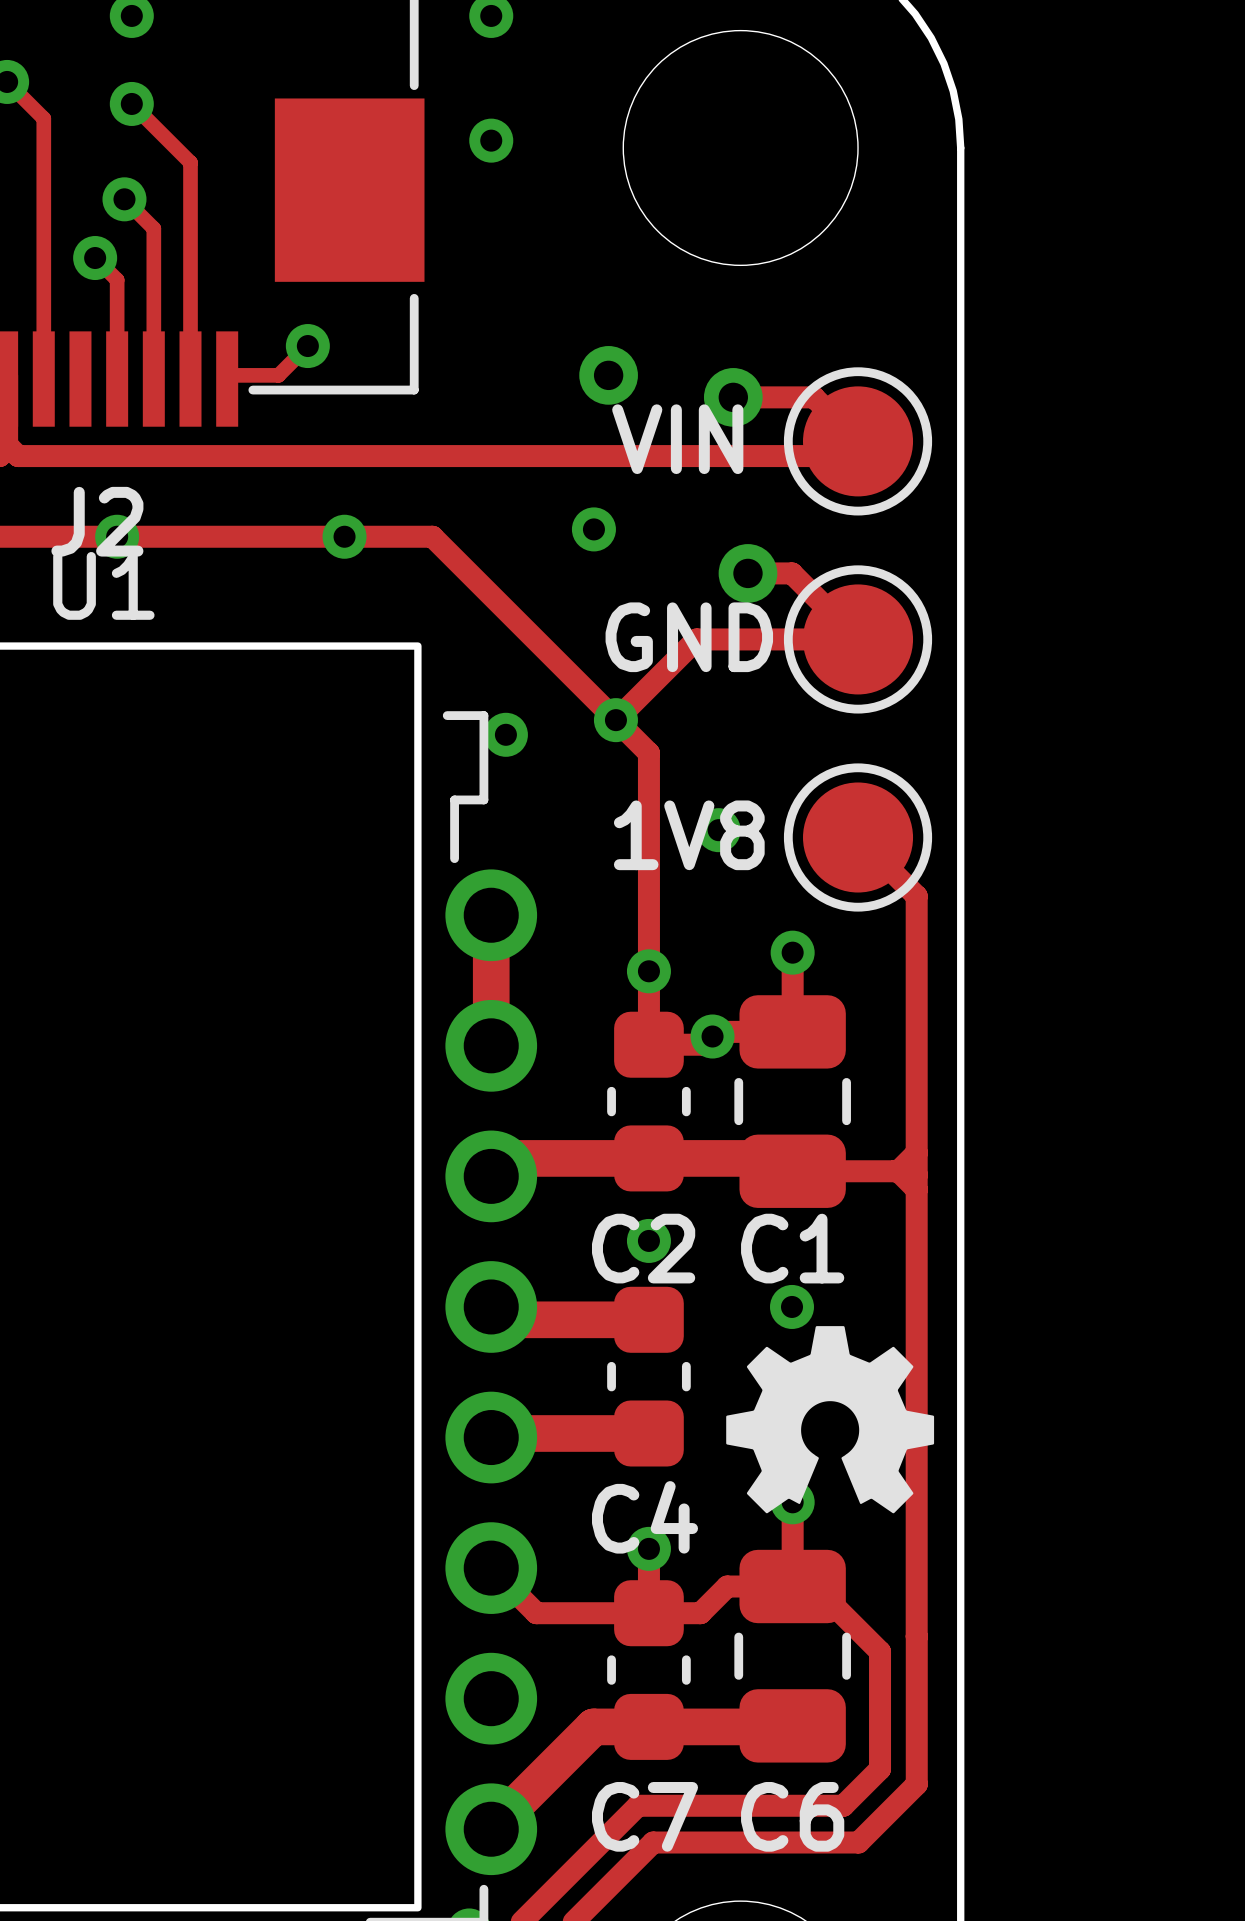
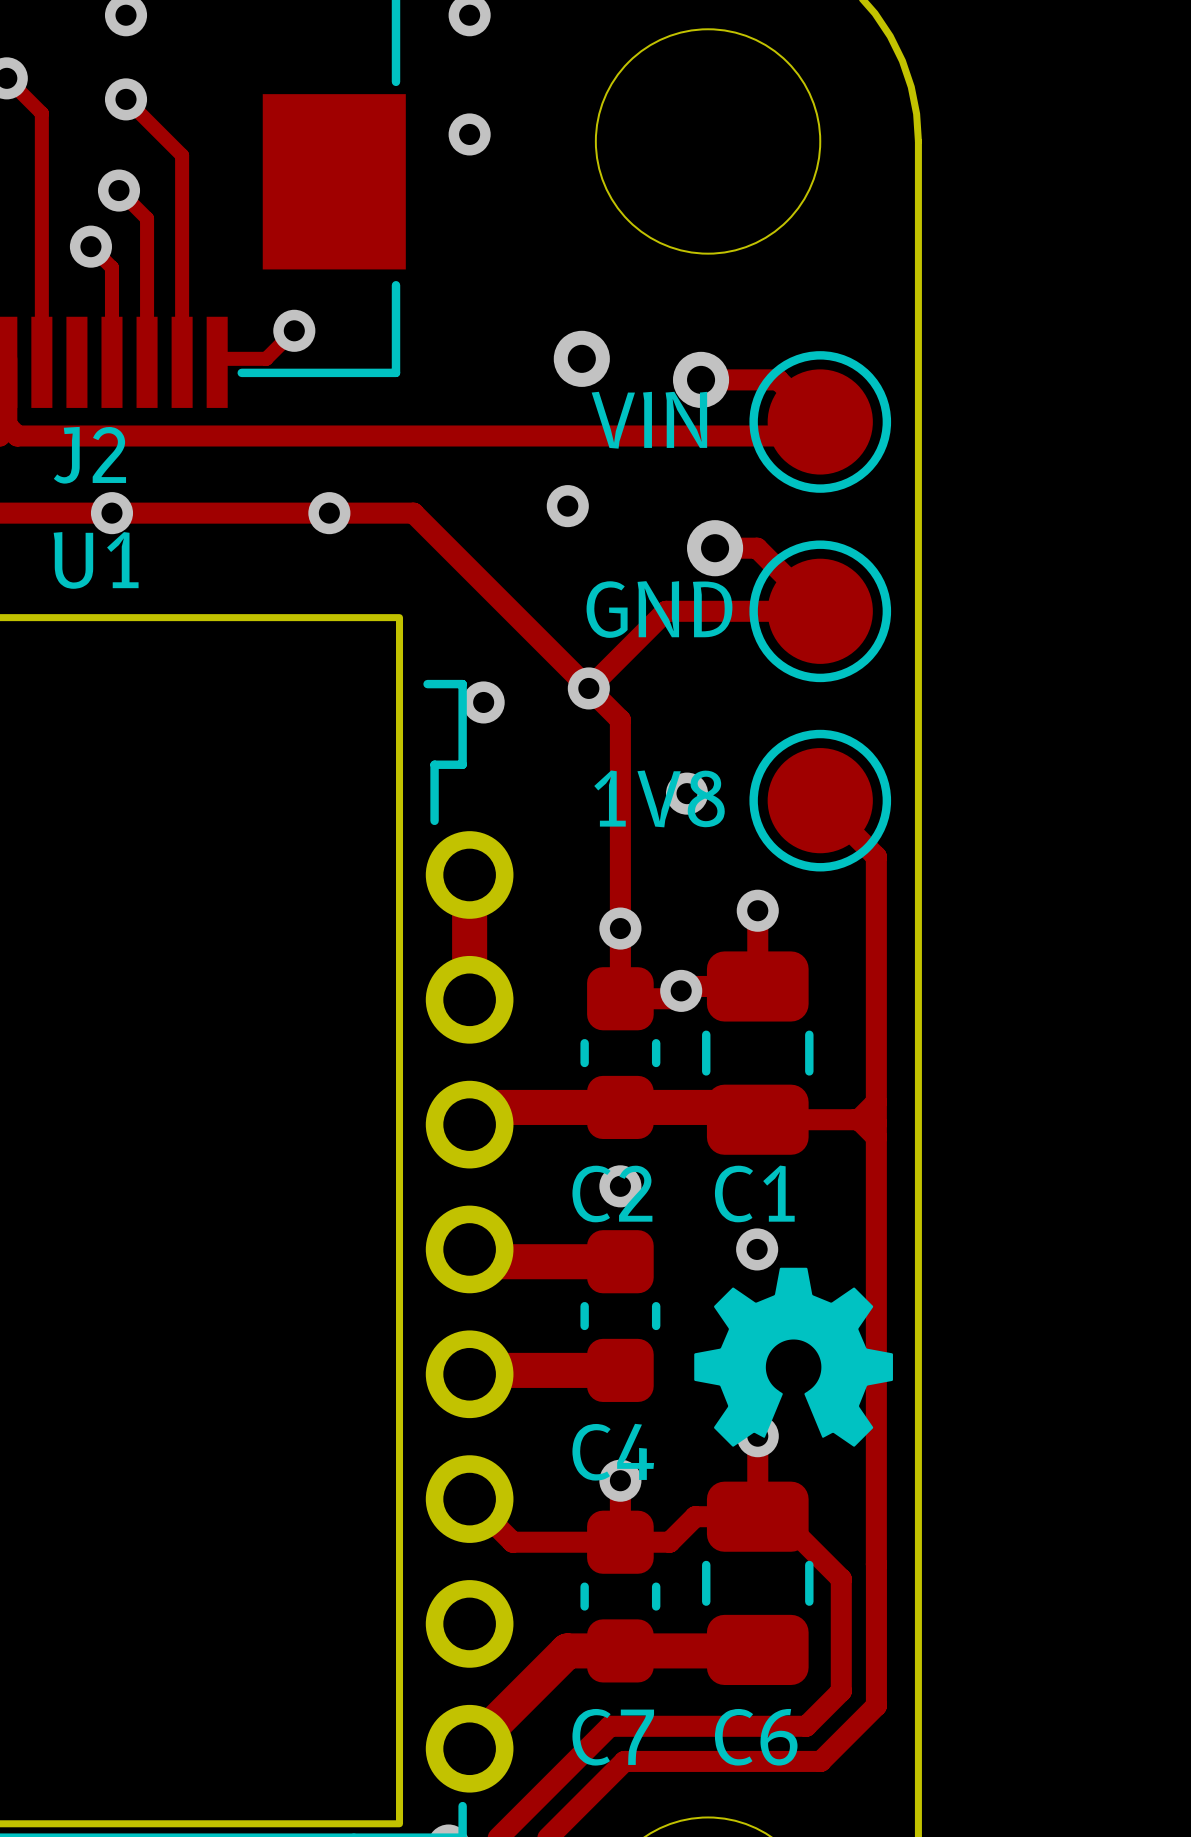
J2 name position: J2 (97, 521) -> J2 (89, 455)

